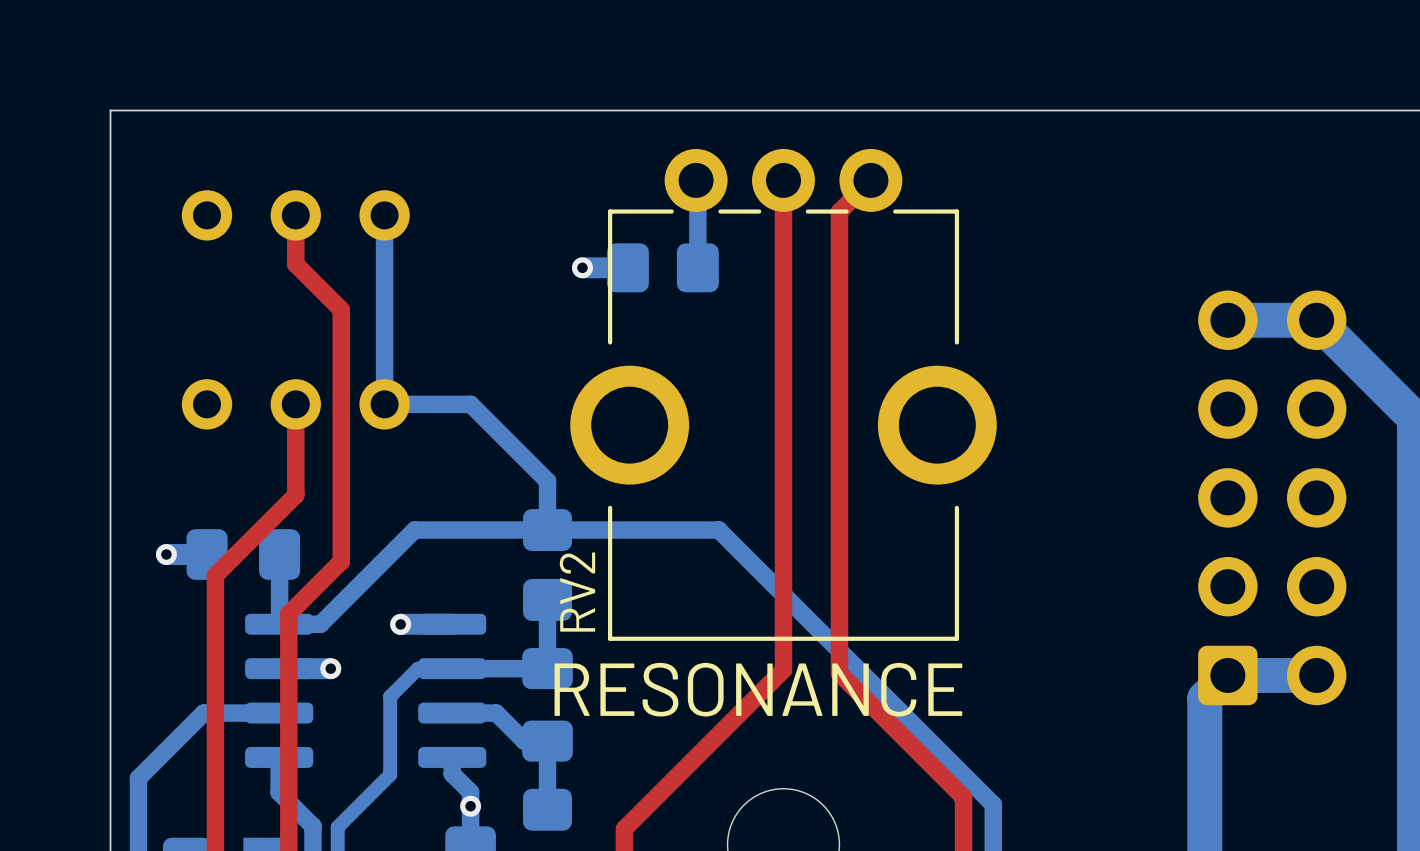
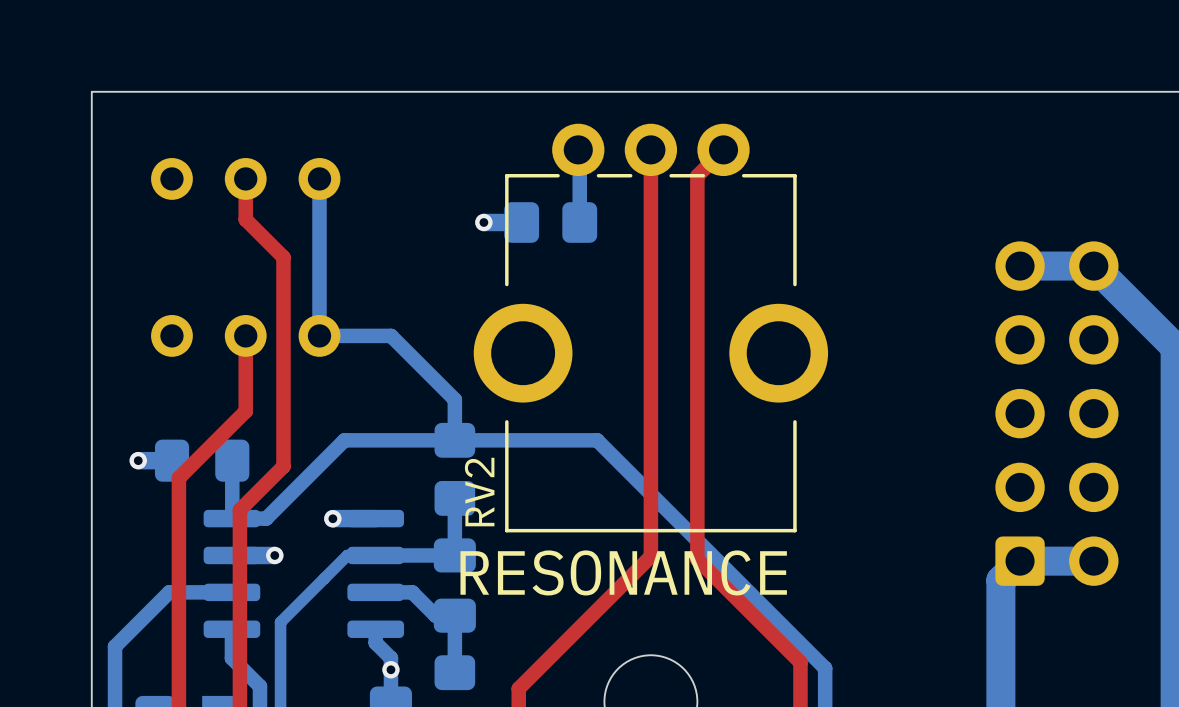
bottom track: (390, 696) (390, 774) (337, 827) -> (324, 578) (280, 622) (280, 687)

